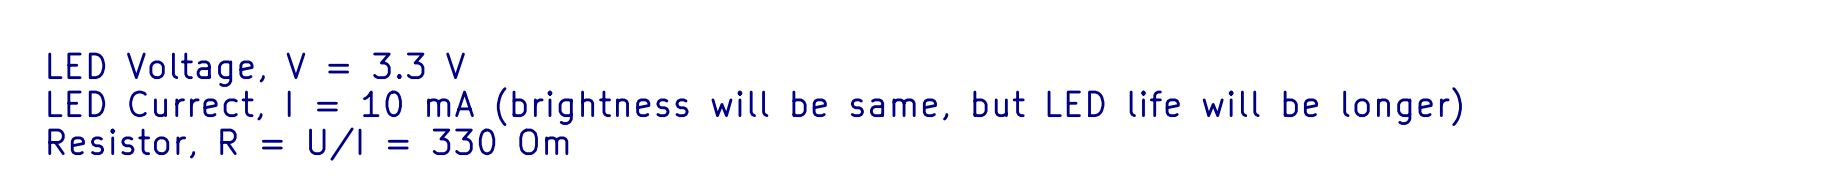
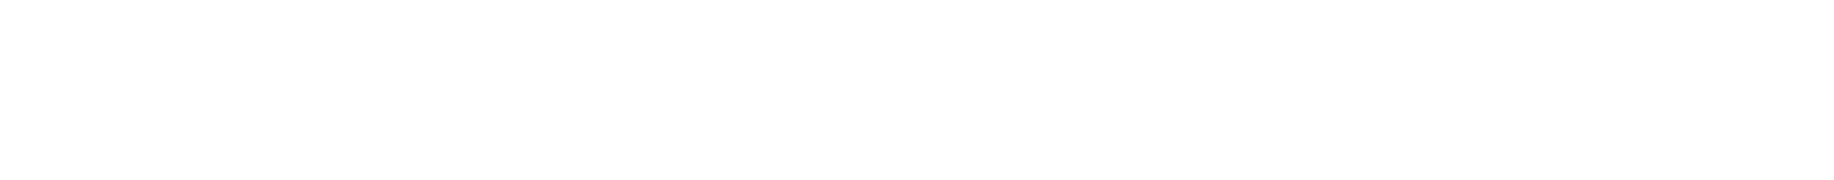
text: LED Voltage, V = 3.3 V (256, 69) -> none
text: LED Currect, I = 10 mA (brightness will be same, but LED life will be longer) (755, 106) -> none
text: Resistor, R = U/I = 330 Om (308, 144) -> none

